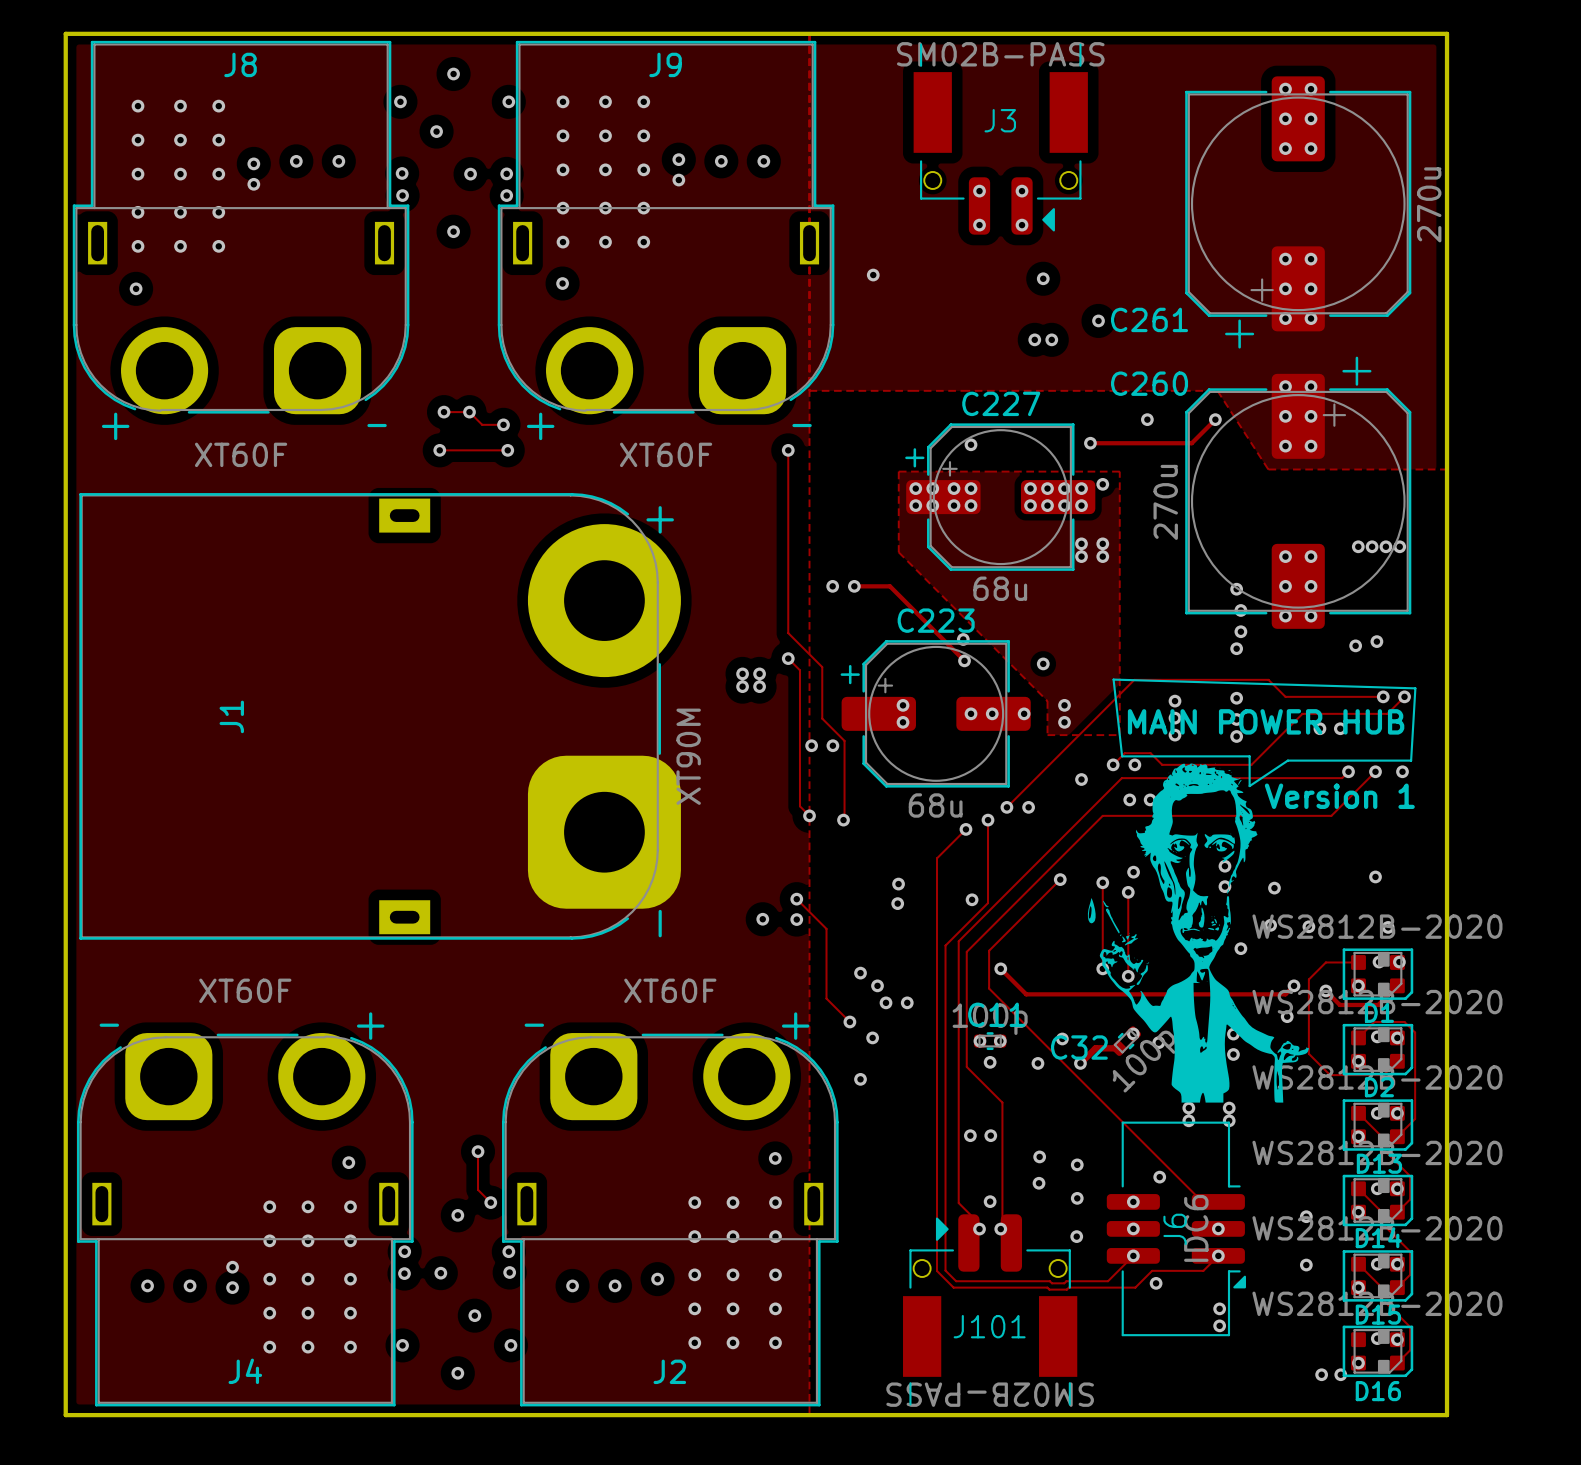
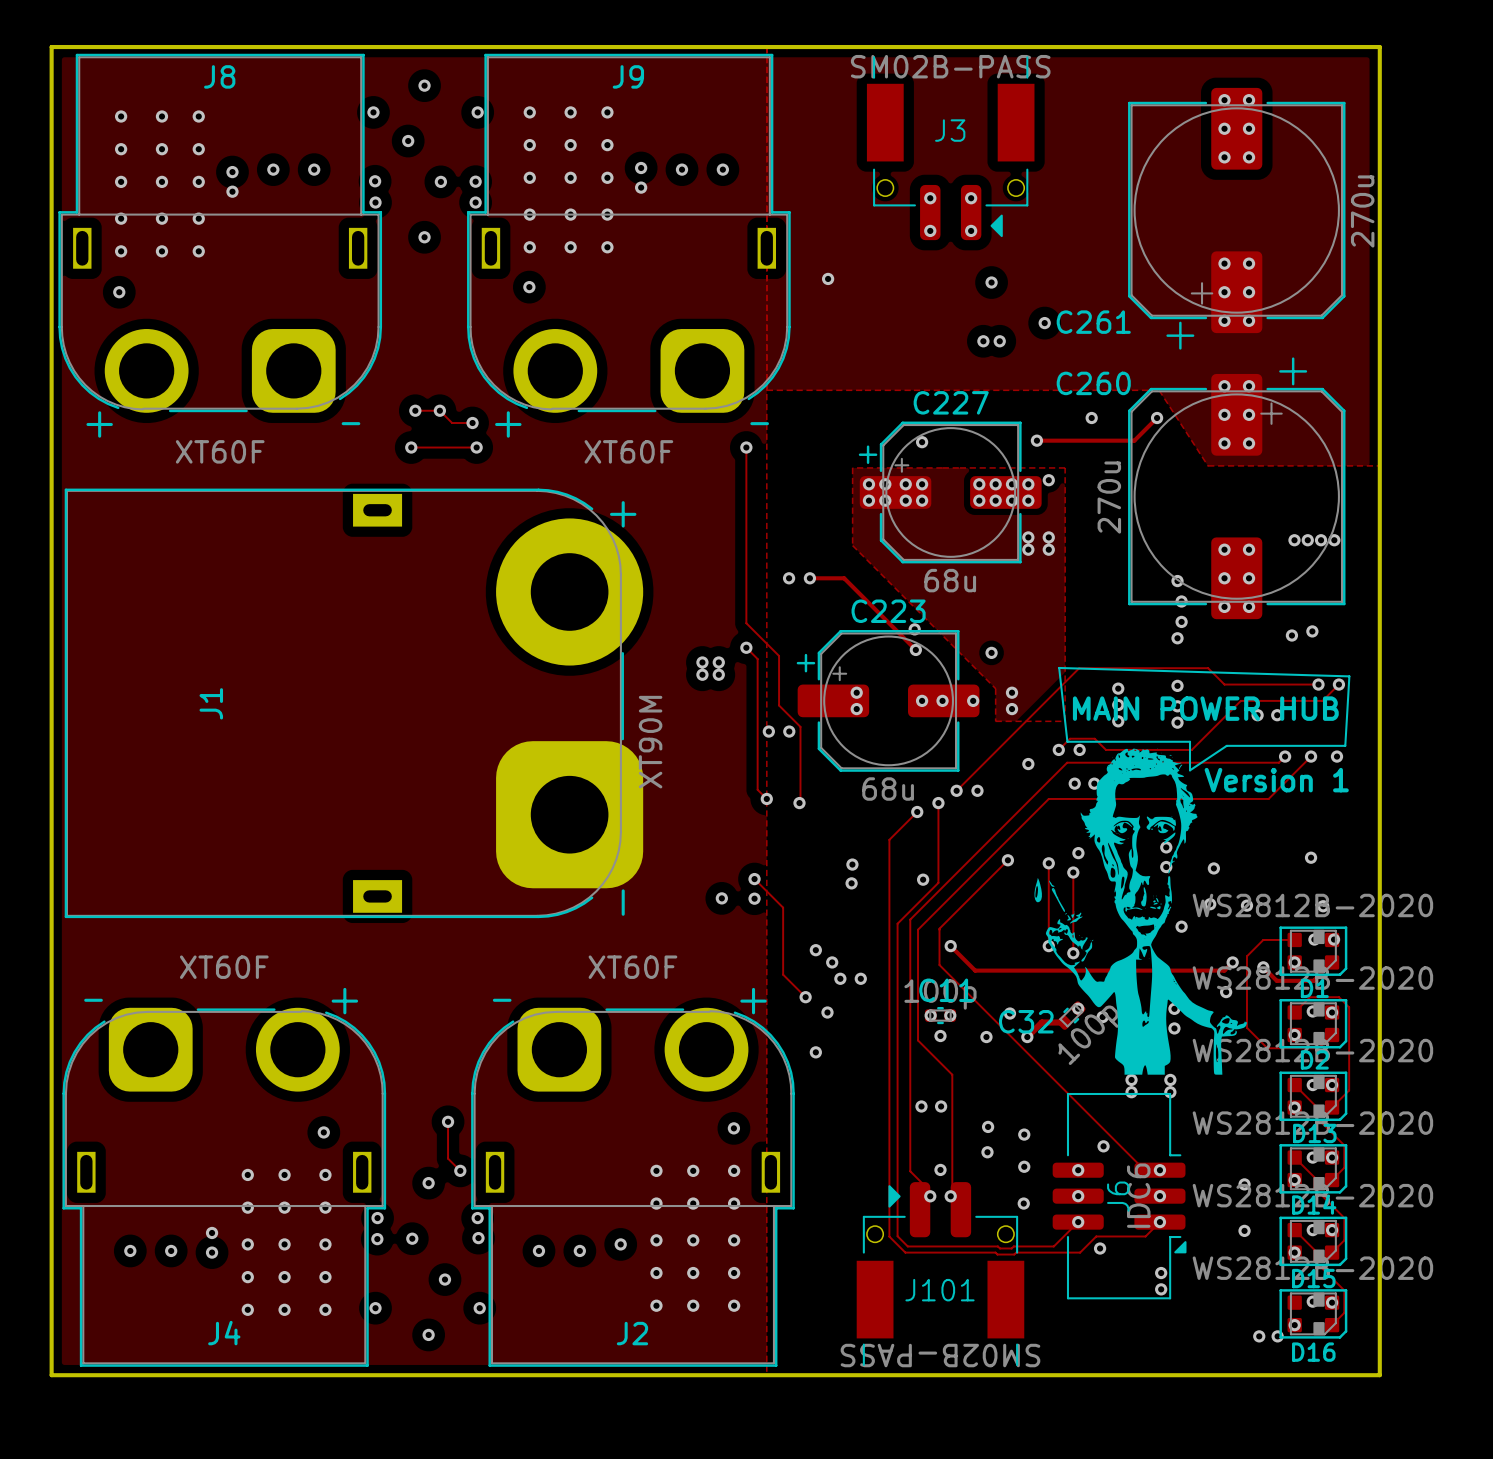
via: none -> (1159, 1170)

